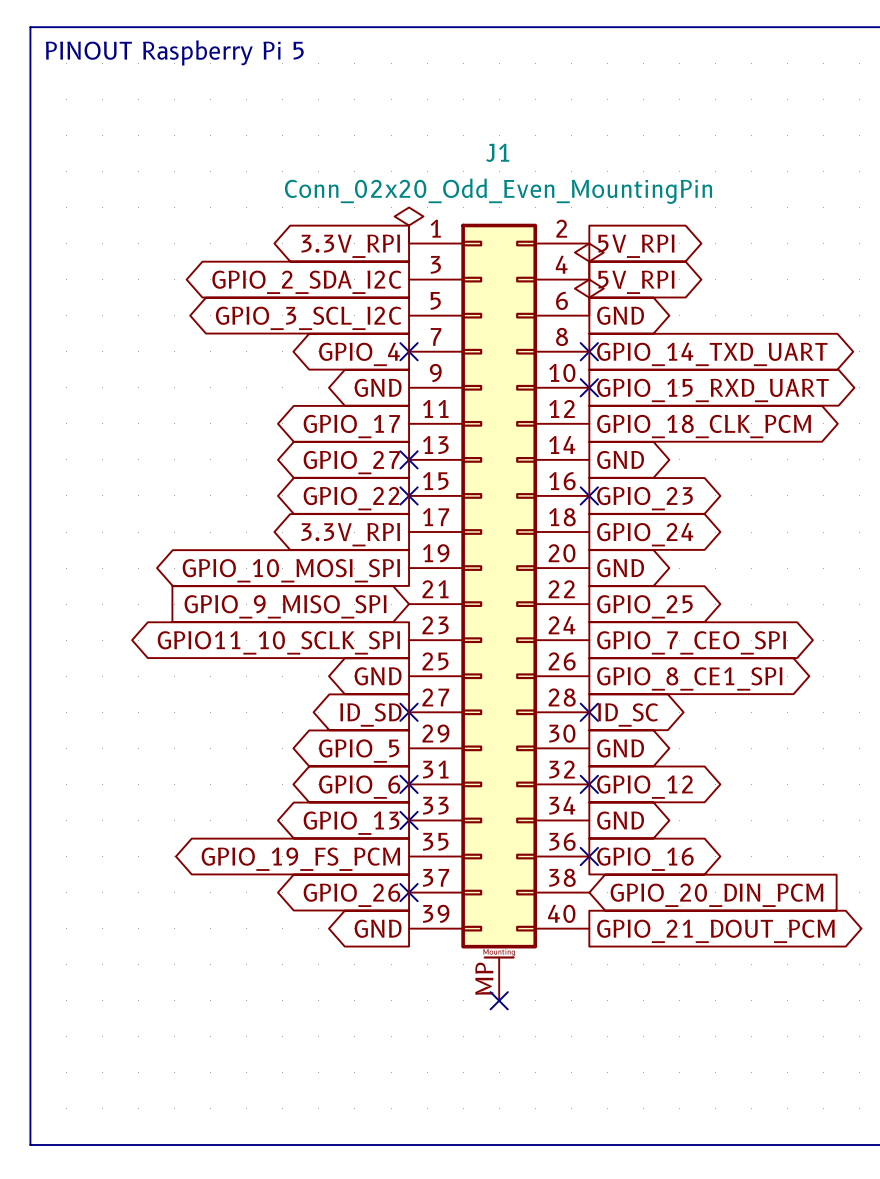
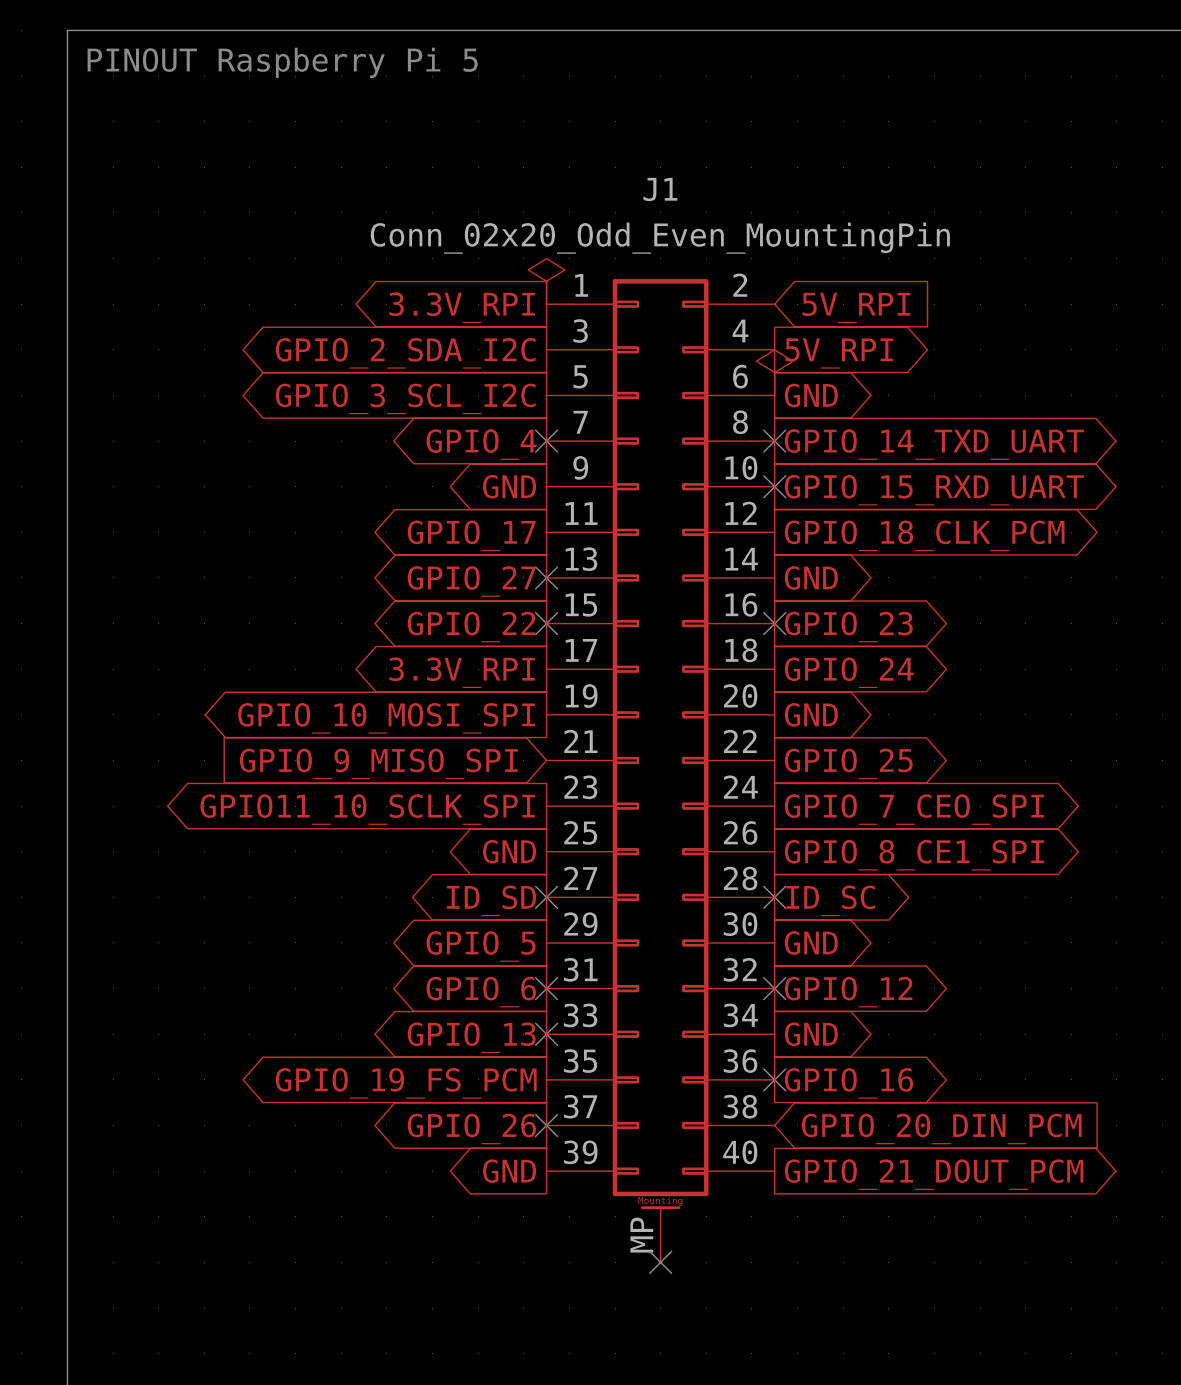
global label shape: output (636, 246) -> input (856, 307)
power symbol: (589, 261) -> none

